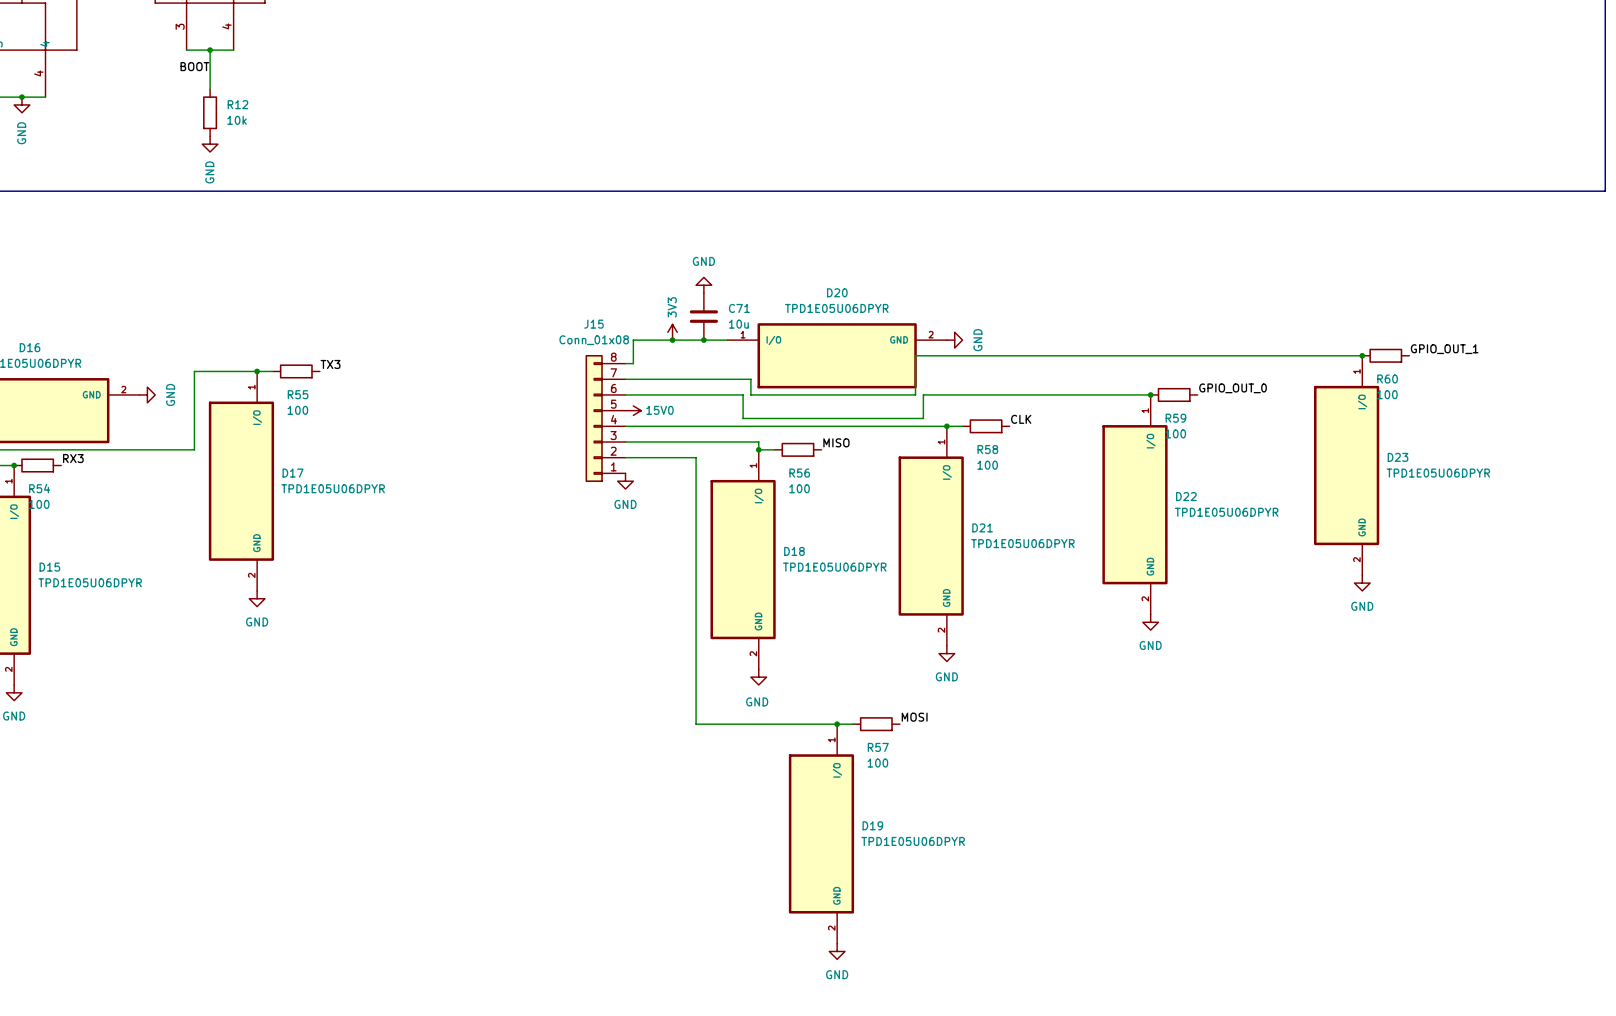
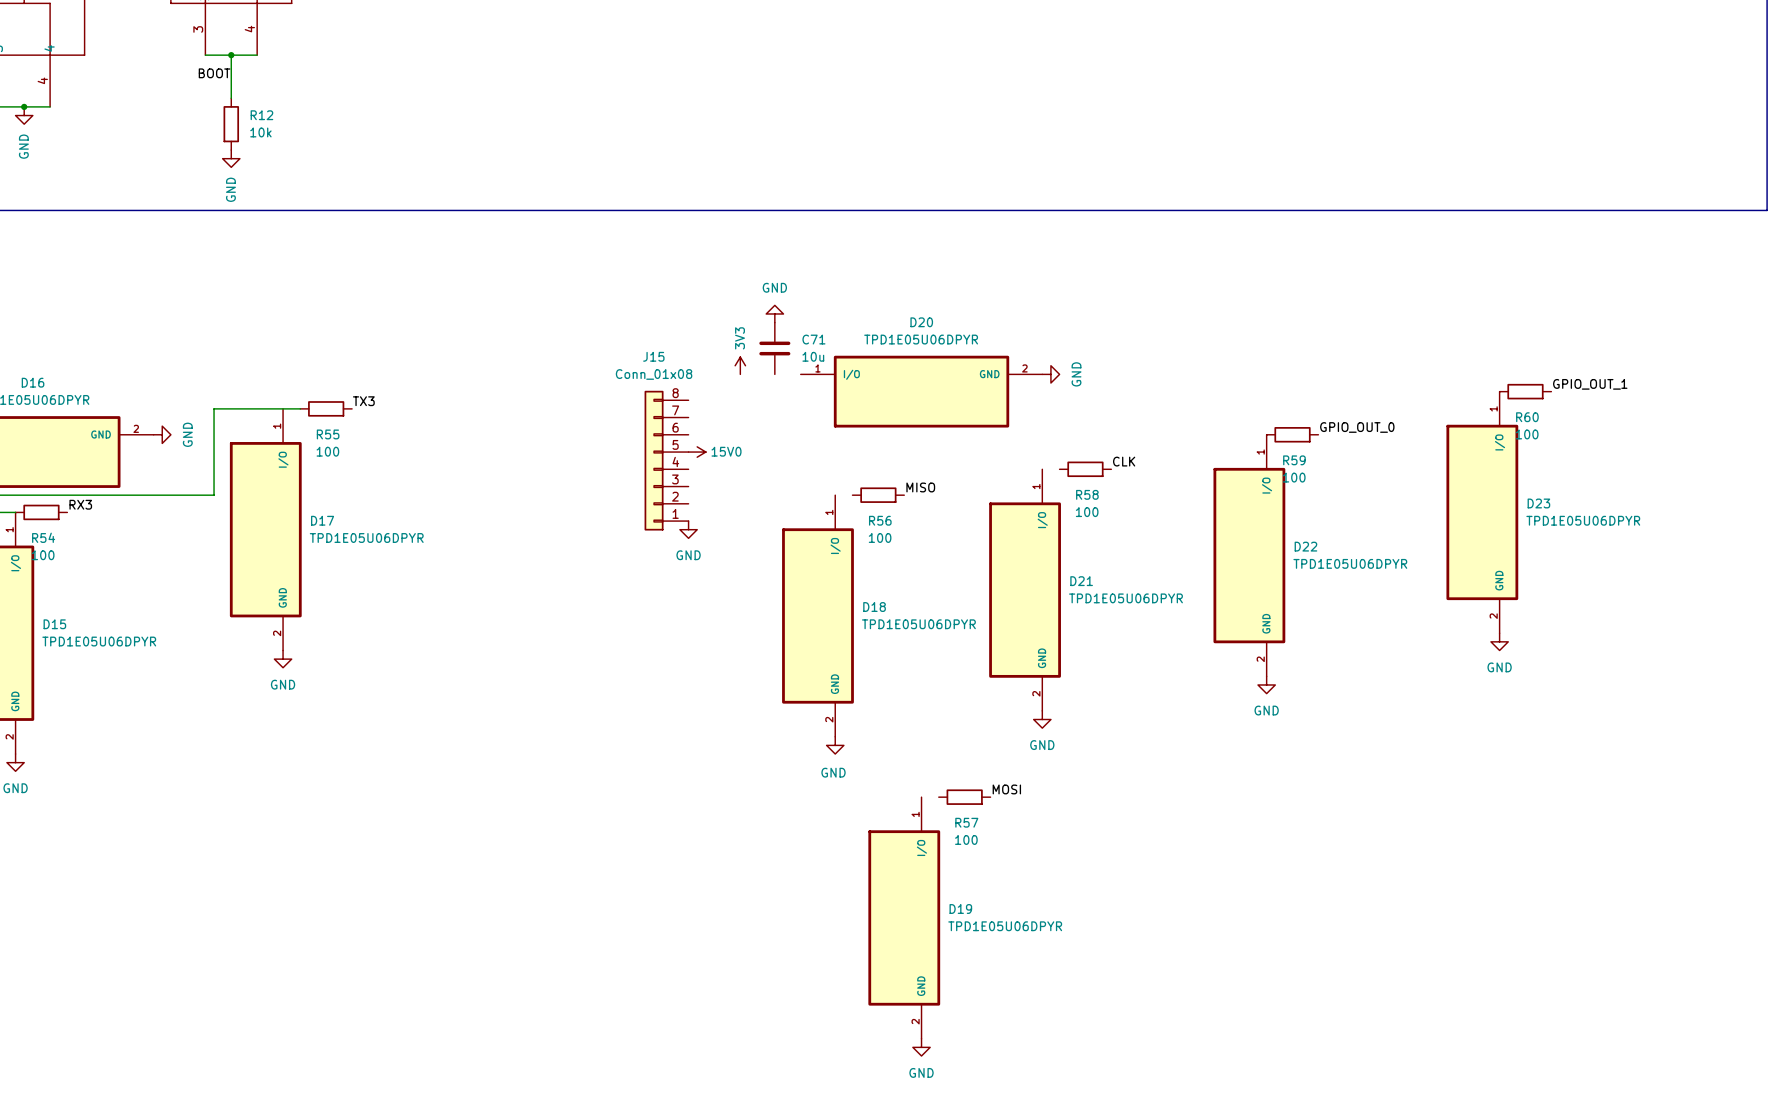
junction: (672, 340) -> none
junction: (703, 340) -> none
wire: (727, 340) (633, 340) (633, 363) (625, 363) -> none
wire: (1362, 355) (915, 355) (915, 394) (750, 394) (750, 379) (625, 379) -> none
junction: (1362, 355) -> none
junction: (257, 371) -> none
wire: (625, 394) (743, 394) (743, 418) (923, 418) (923, 394) (1150, 394) -> none
junction: (1150, 394) -> none
wire: (625, 426) (962, 426) -> none
junction: (946, 426) -> none
wire: (625, 442) (758, 442) (758, 449) (774, 449) -> none
junction: (758, 449) -> none
wire: (625, 457) (696, 457) (696, 724) (852, 724) -> none
junction: (14, 465) -> none
junction: (837, 724) -> none

